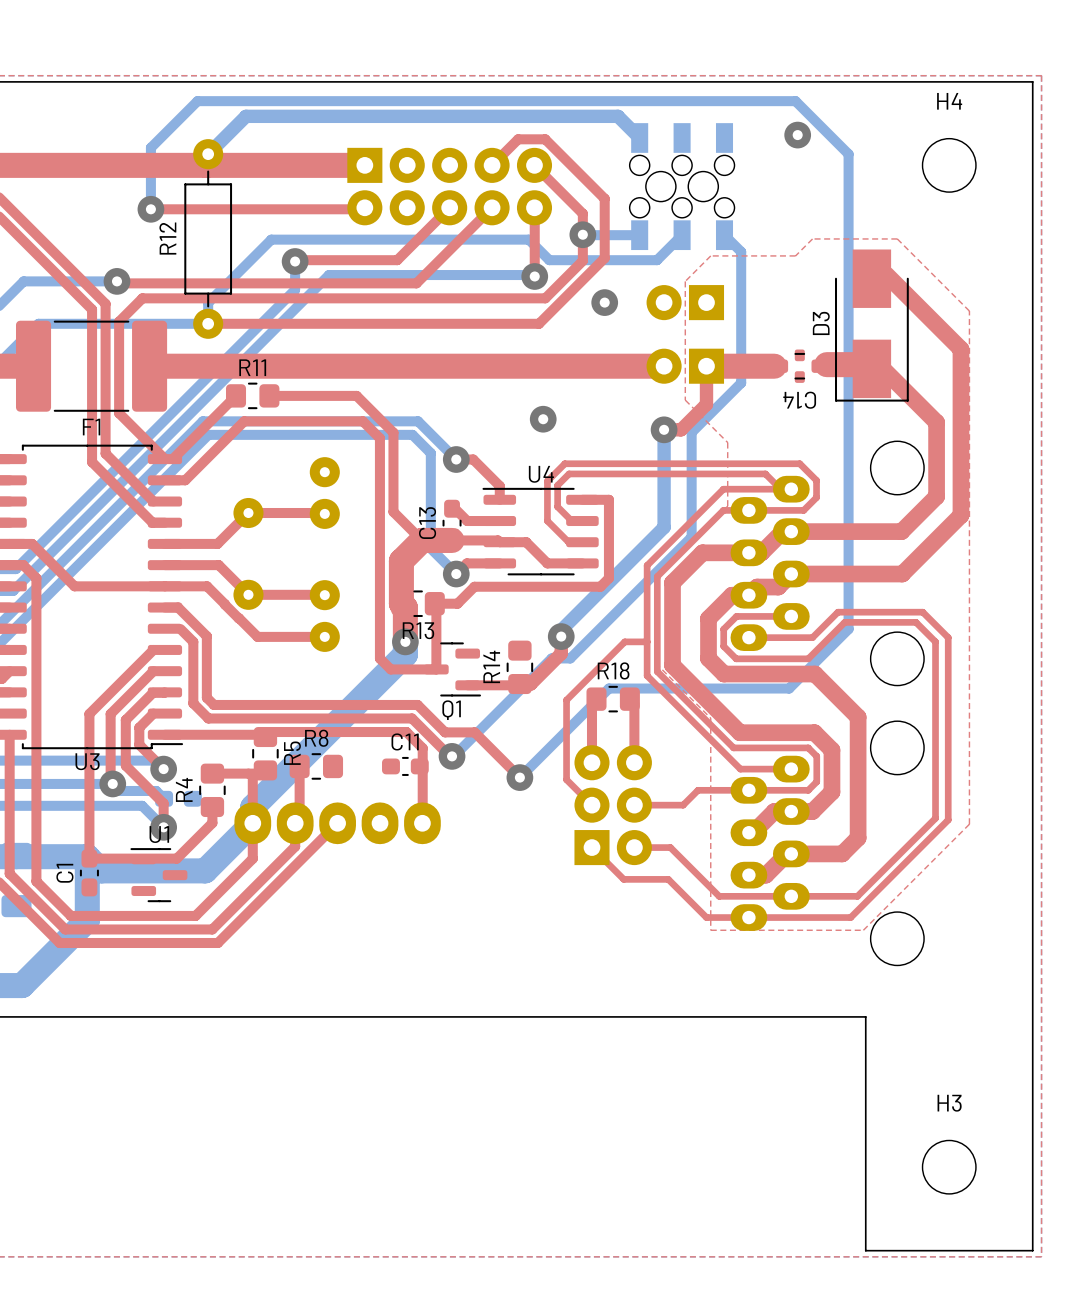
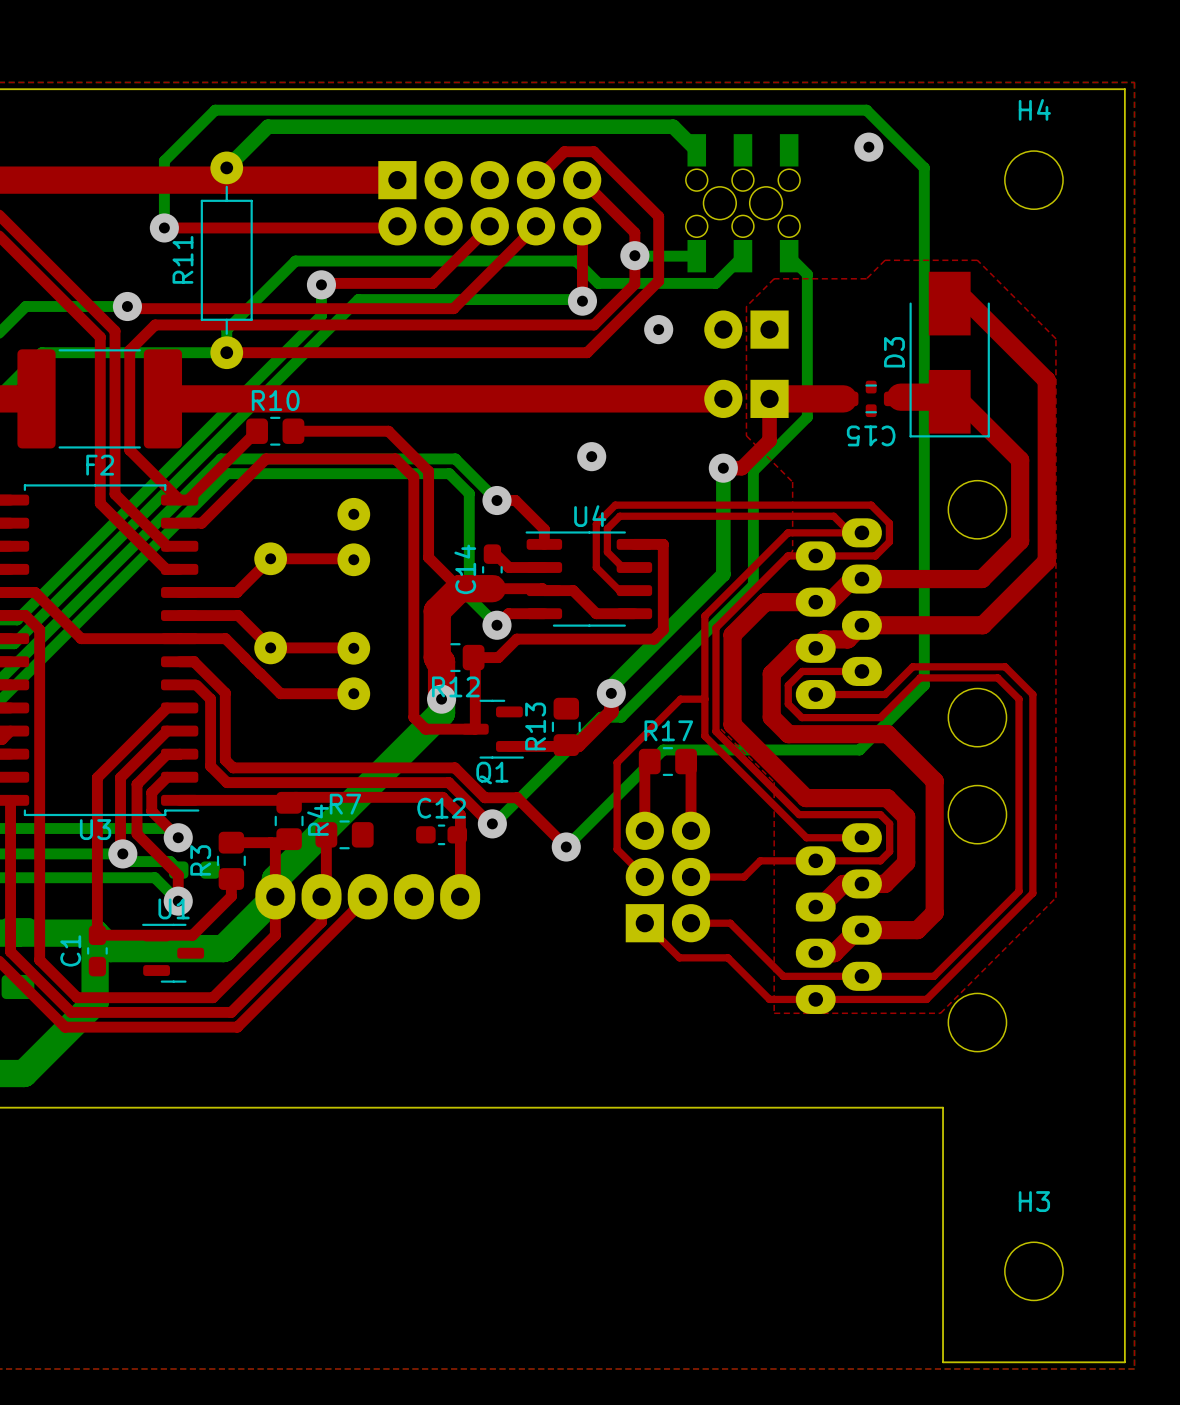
R12 name: R12 (167, 238) -> R11 (182, 259)
R11 name: R11 (252, 367) -> R10 (275, 400)
C14 name: C14 (799, 400) -> C15 (871, 435)
F1 name: F1 (91, 427) -> F2 (100, 465)
C13 name: C13 (427, 523) -> C14 (465, 569)
R13 name: R13 (418, 630) -> R12 (455, 686)
R14 name: R14 (491, 666) -> R13 (535, 726)
R18 name: R18 (613, 670) -> R17 (668, 730)
R8 name: R8 (316, 738) -> R7 (345, 804)
C11 name: C11 (405, 741) -> C12 (441, 808)
R5 name: R5 (292, 753) -> R4 (318, 820)
R4 name: R4 (184, 789) -> R3 (200, 860)

